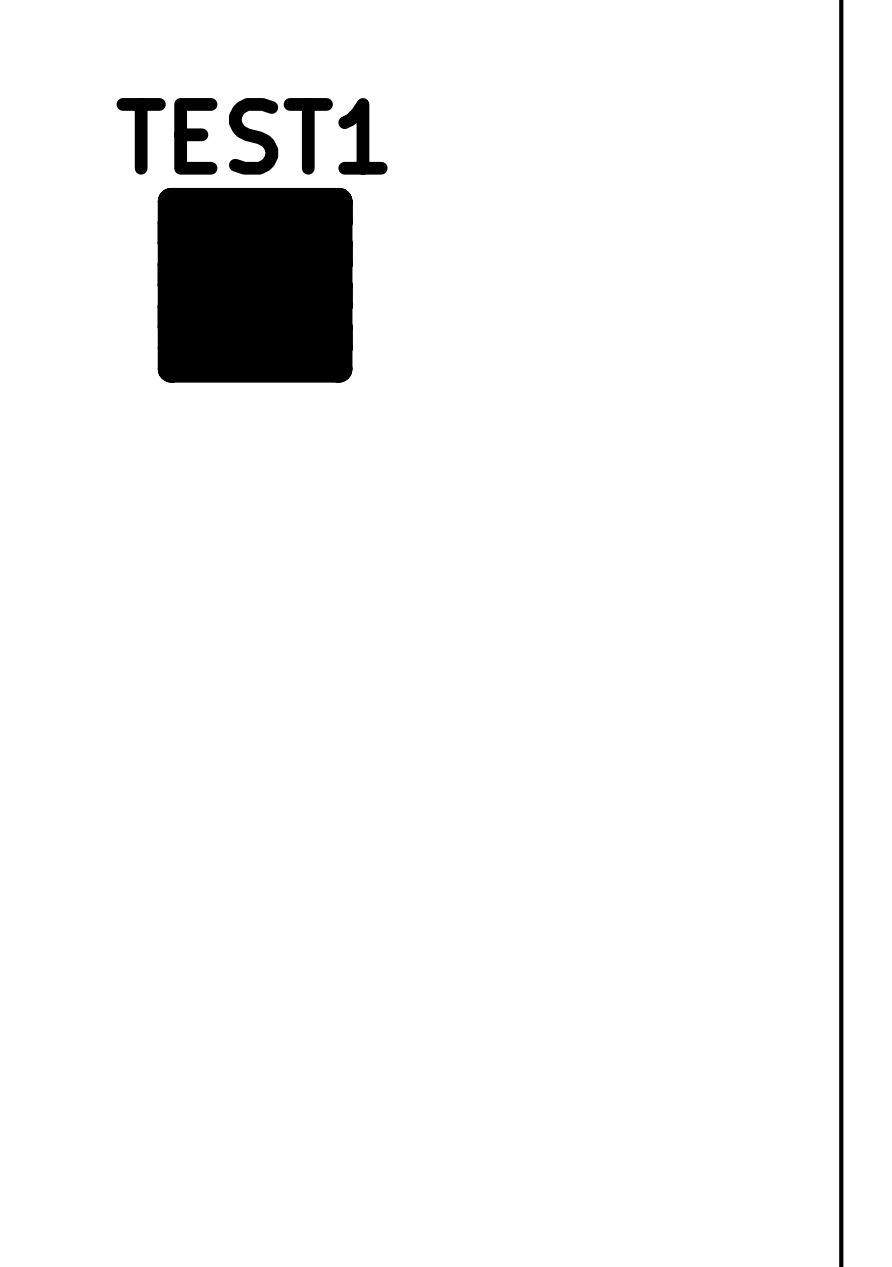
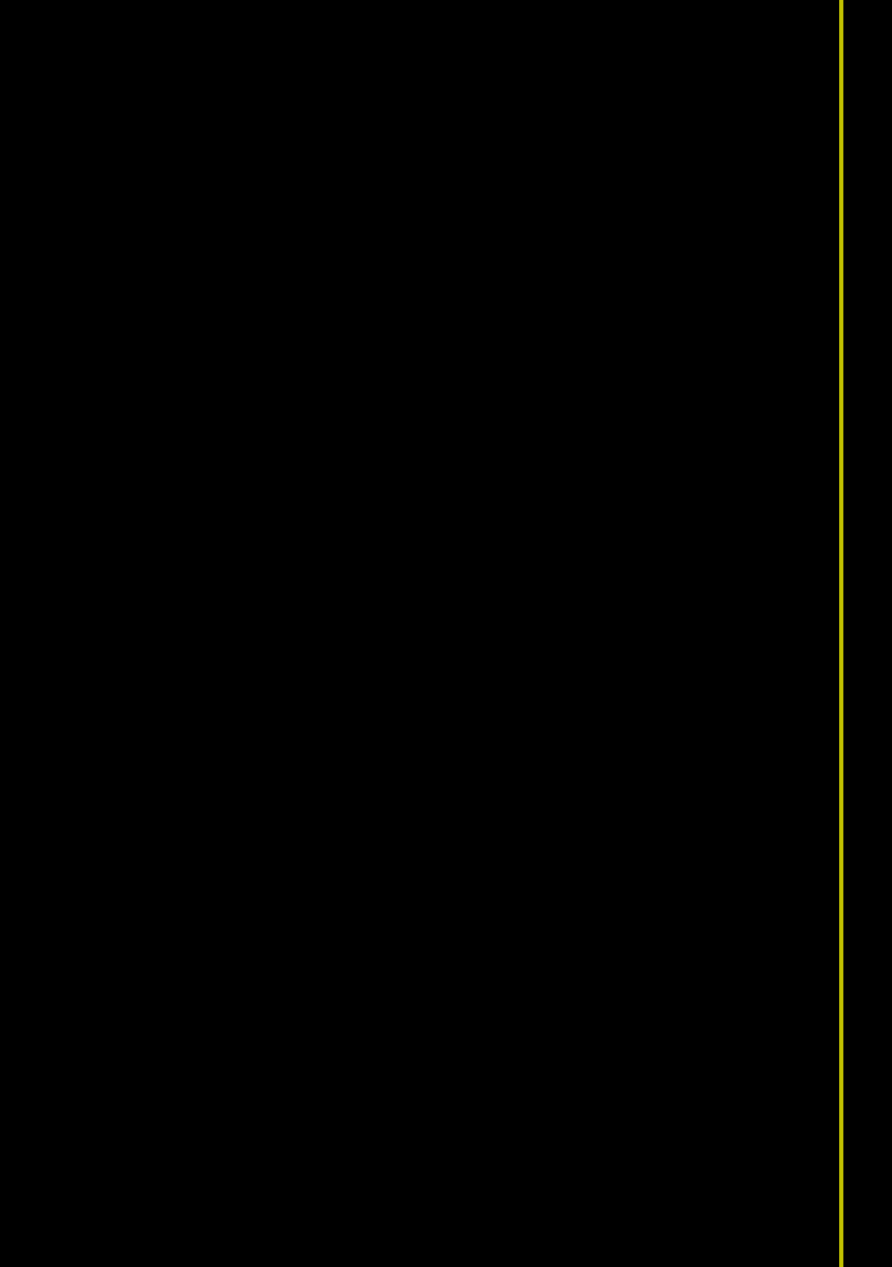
TEST1: (255, 285) -> none

